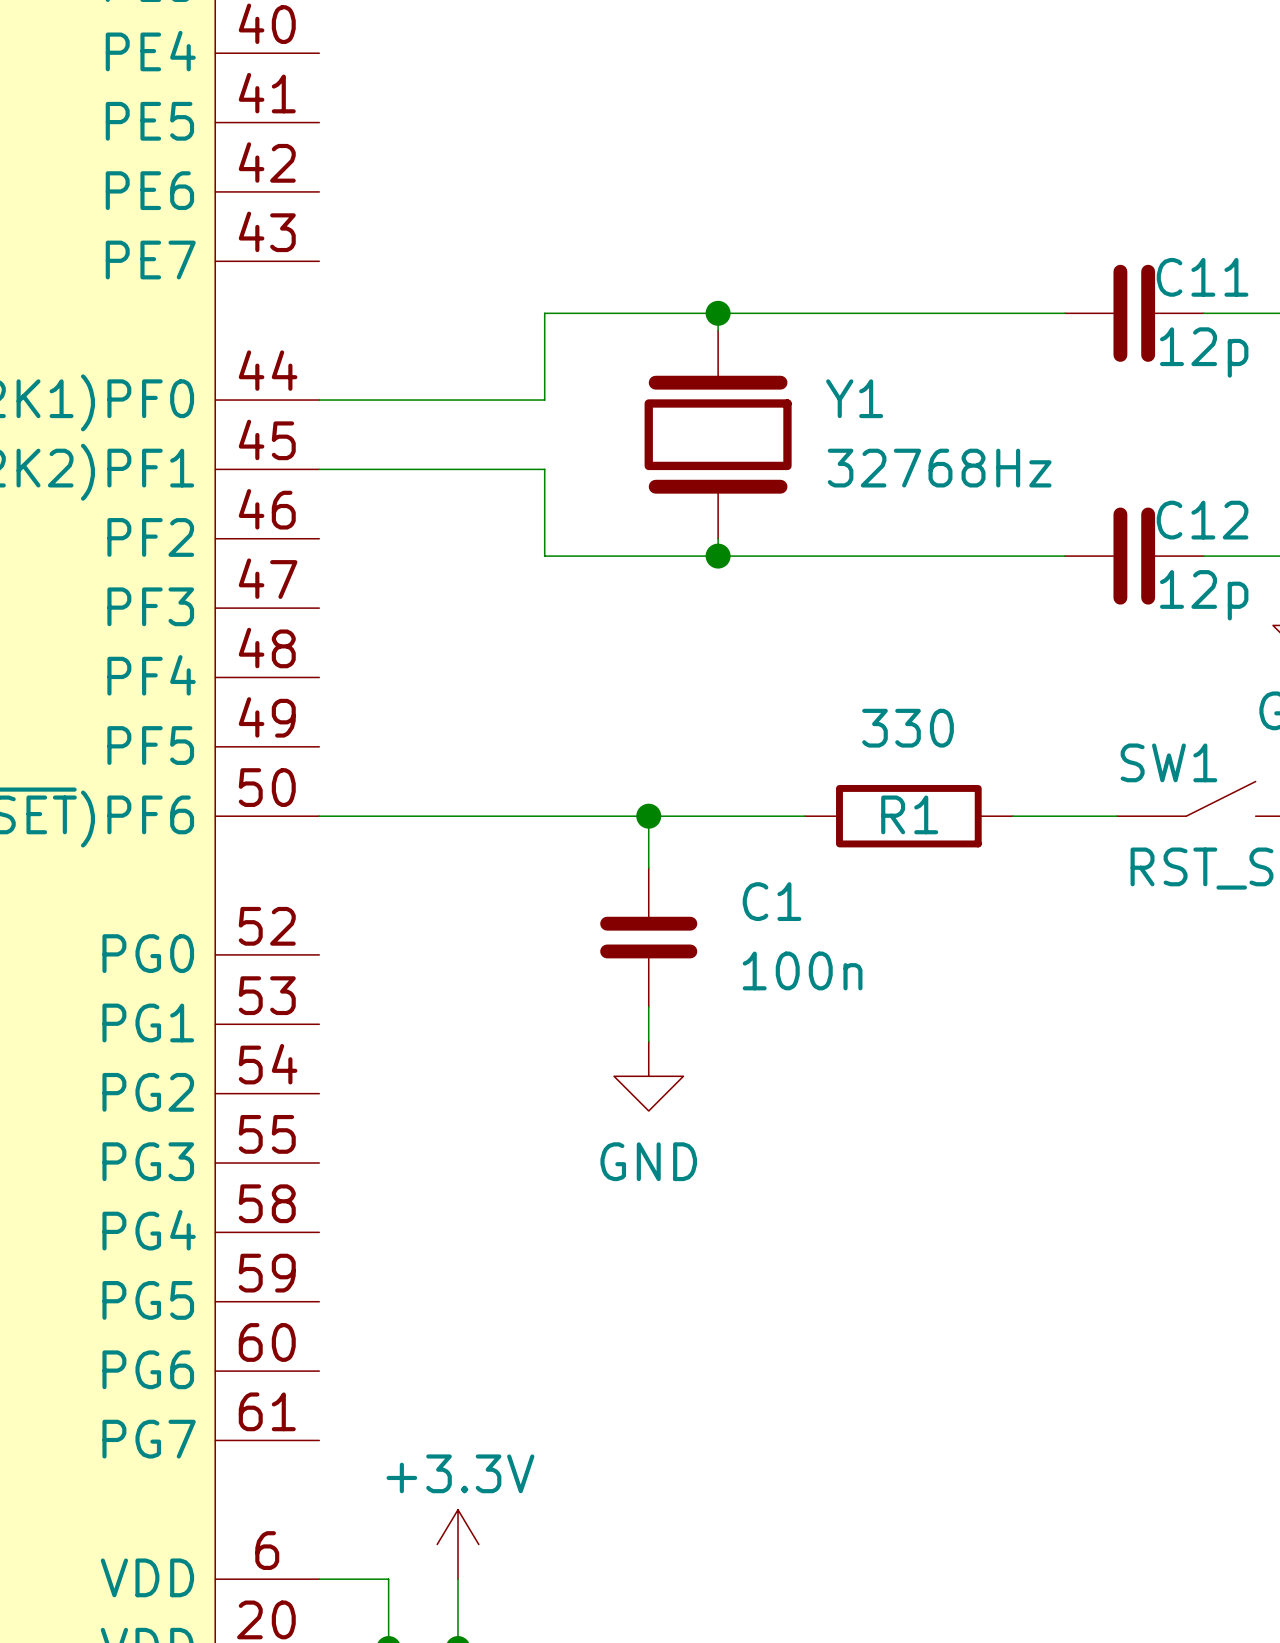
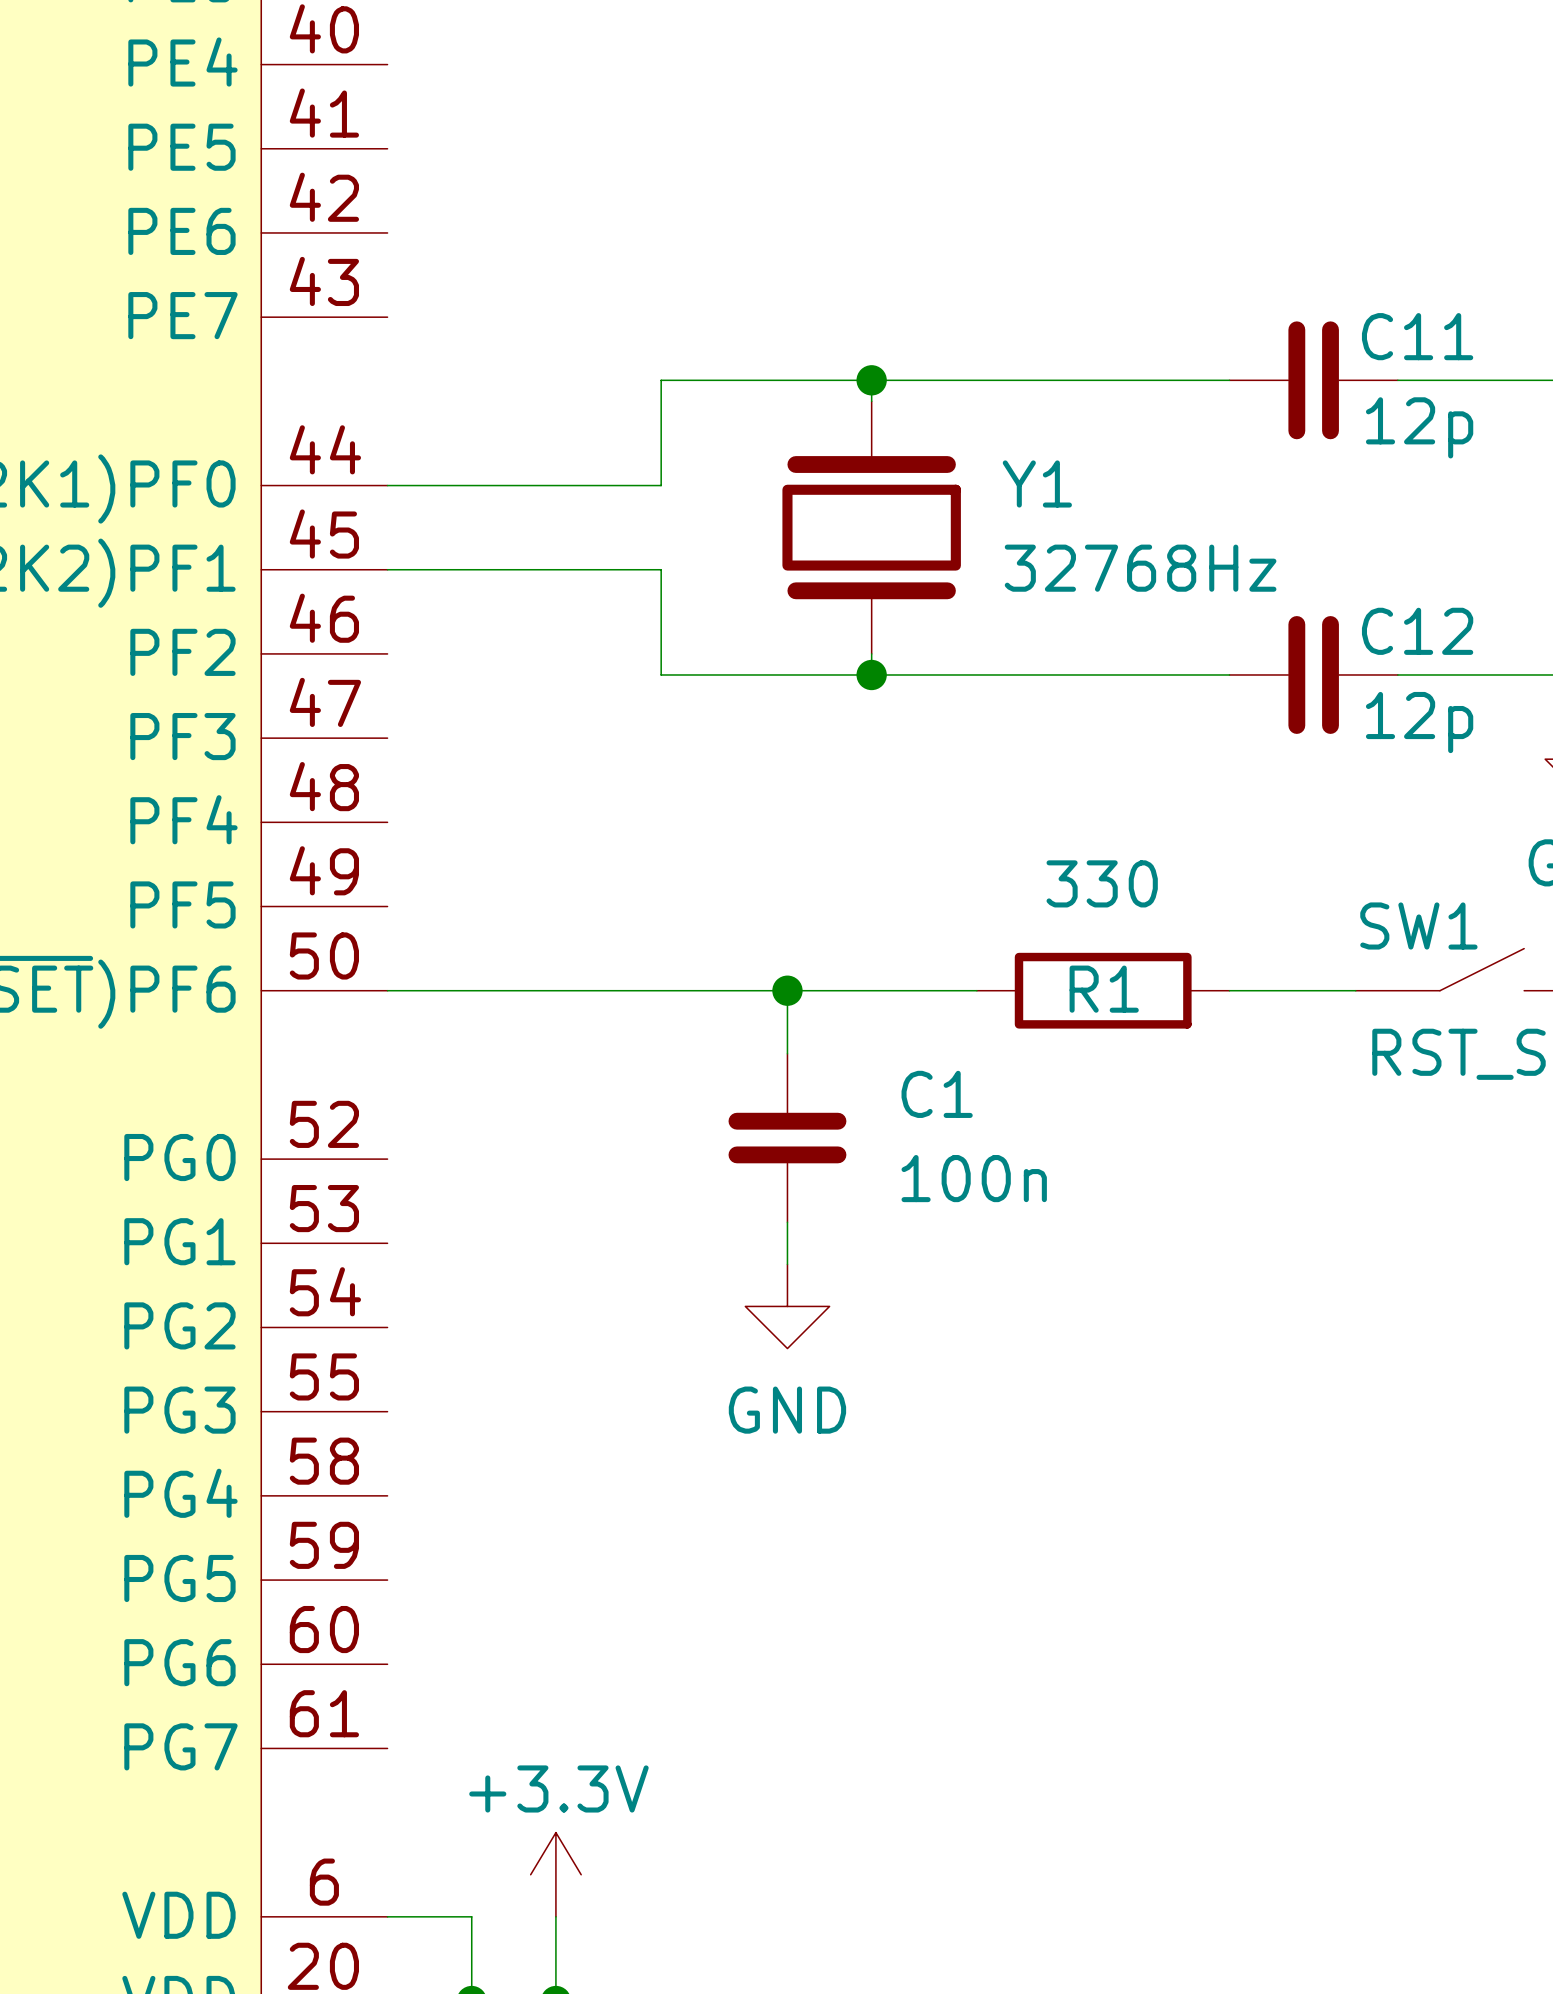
C11 name position: C11 (1202, 277) -> C11 (1417, 336)
C11 position: (1134, 313) -> (1313, 380)
C11 value position: 12p (1204, 352) -> 12p (1419, 427)
C12 name position: C12 (1202, 520) -> C12 (1417, 631)
C12 position: (1134, 556) -> (1313, 674)
C12 value position: 12p (1204, 595) -> 12p (1419, 722)

